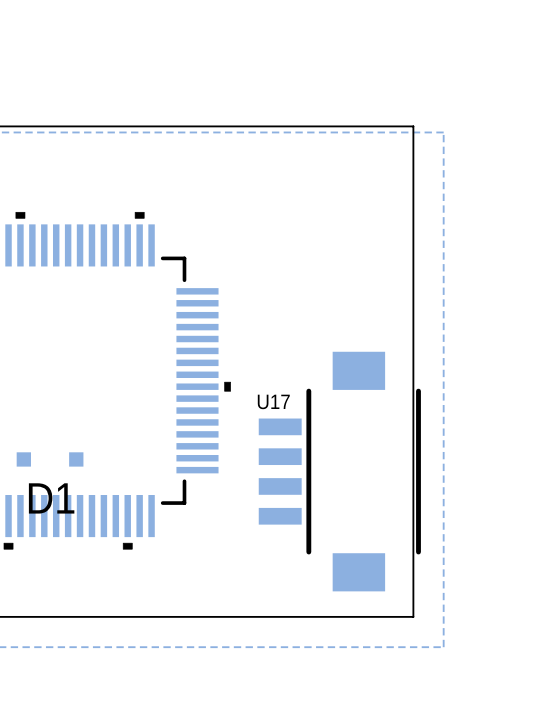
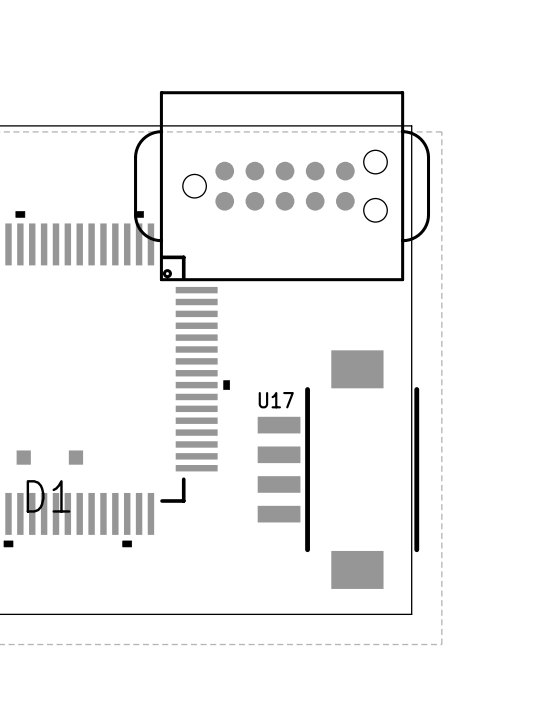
part: none -> (282, 186)

